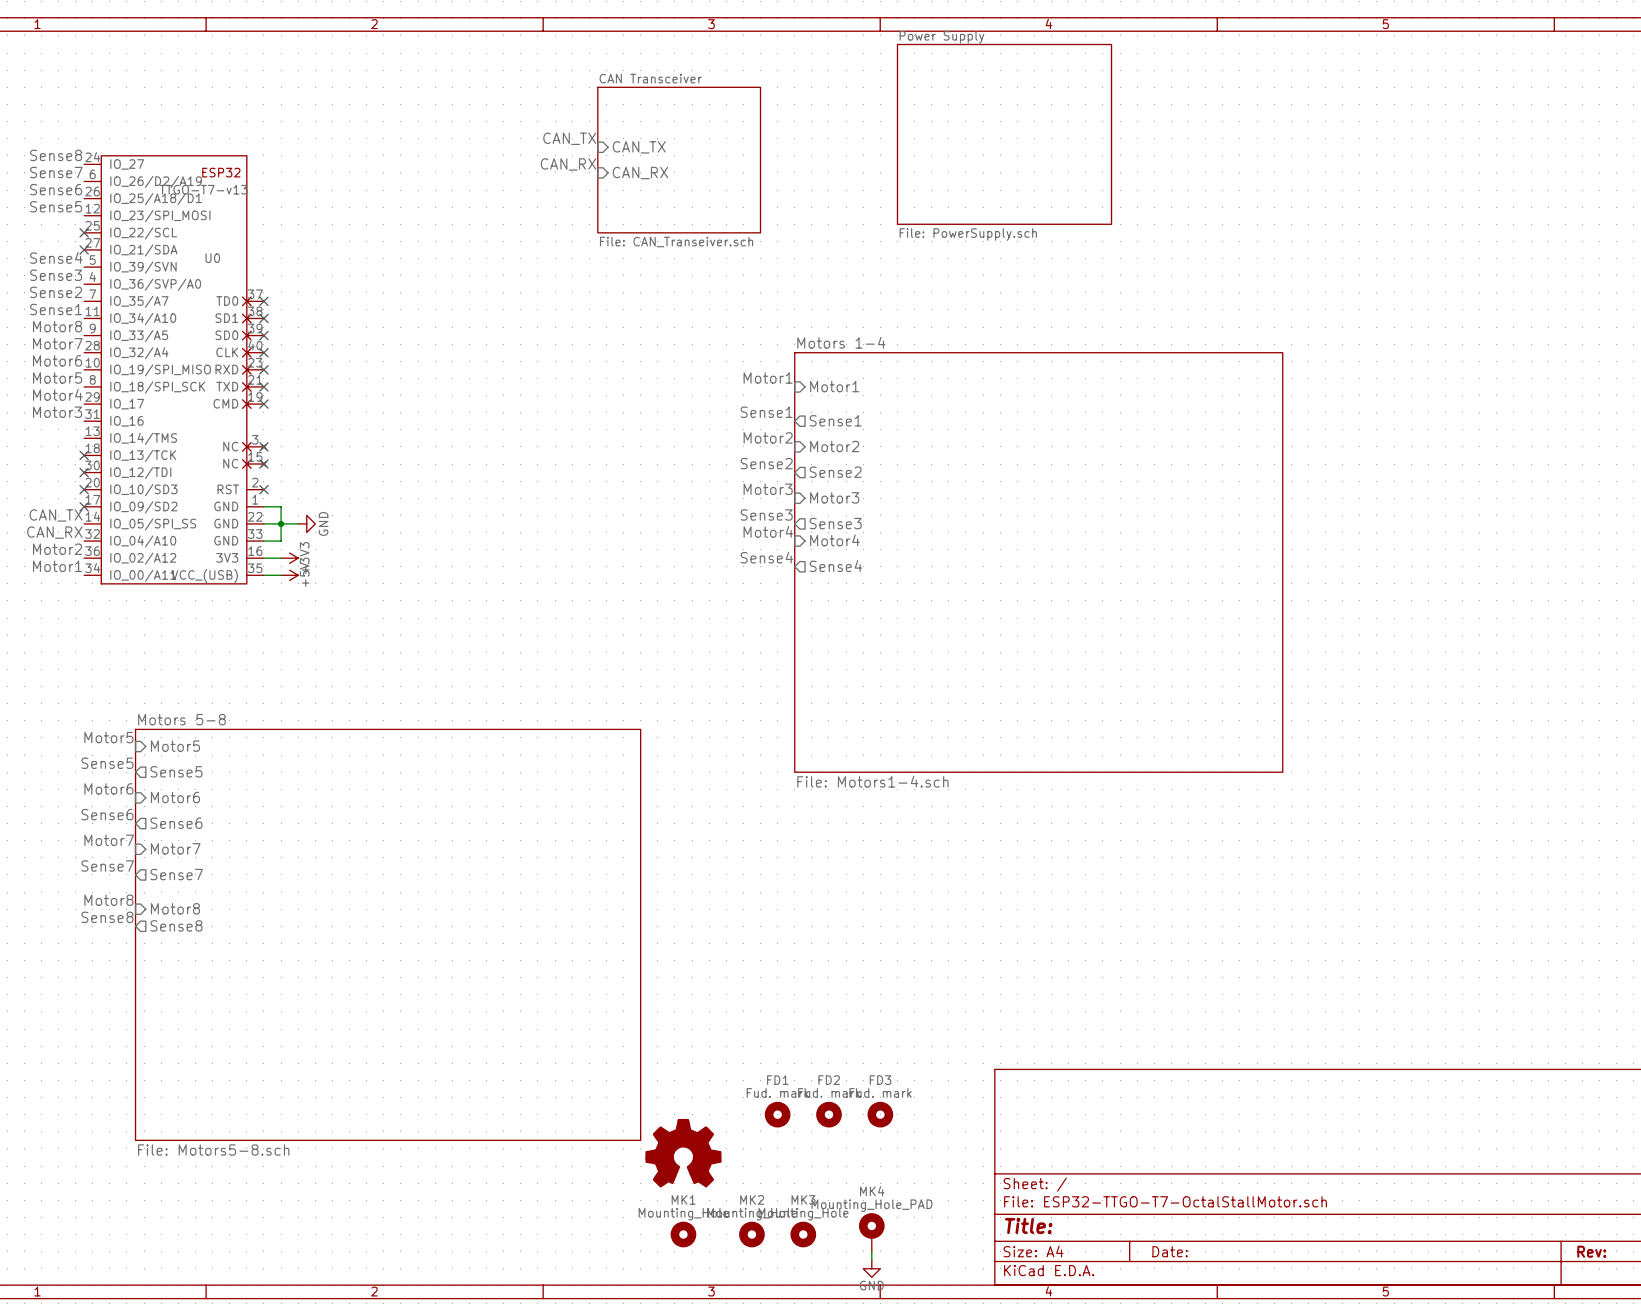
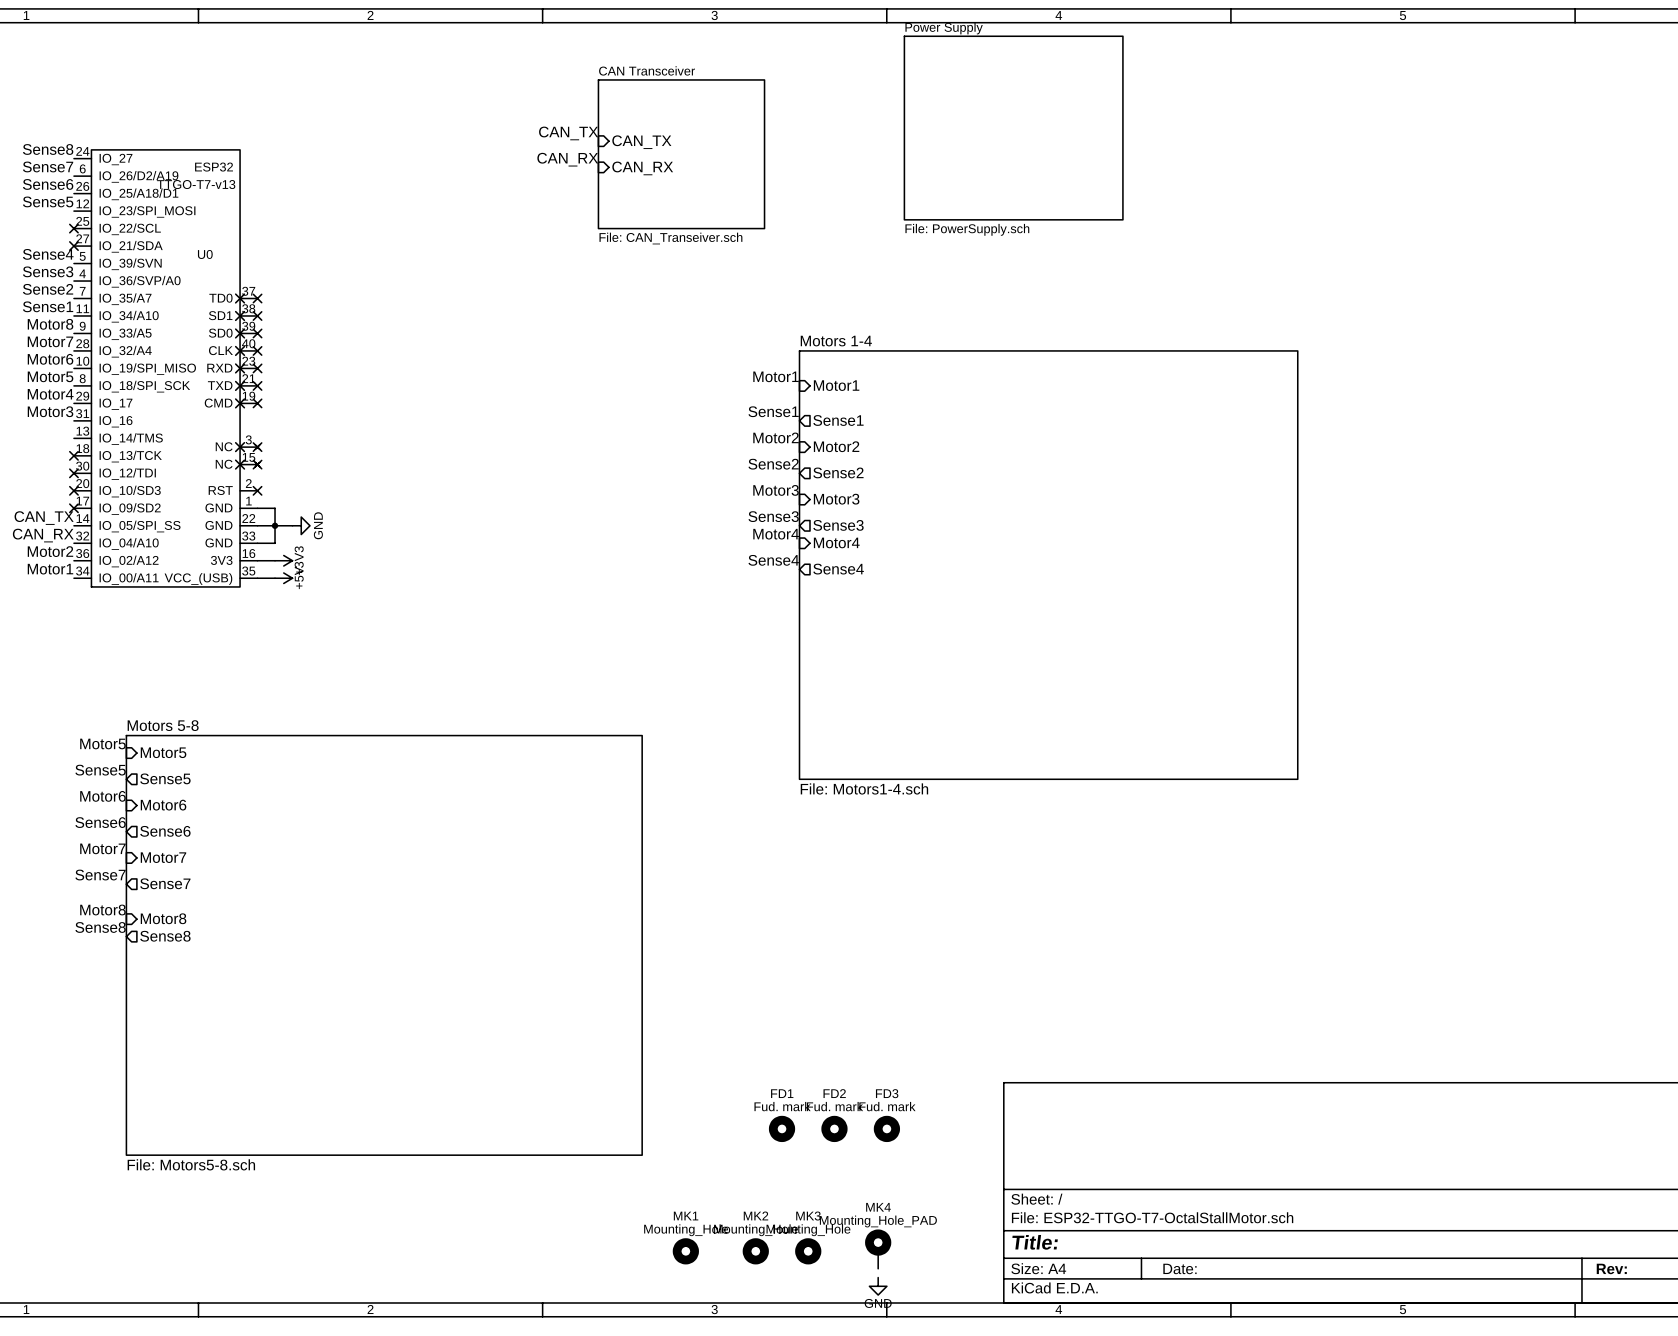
power symbol: (683, 1153) -> none
wire: (871, 1251) (871, 1260) -> none

